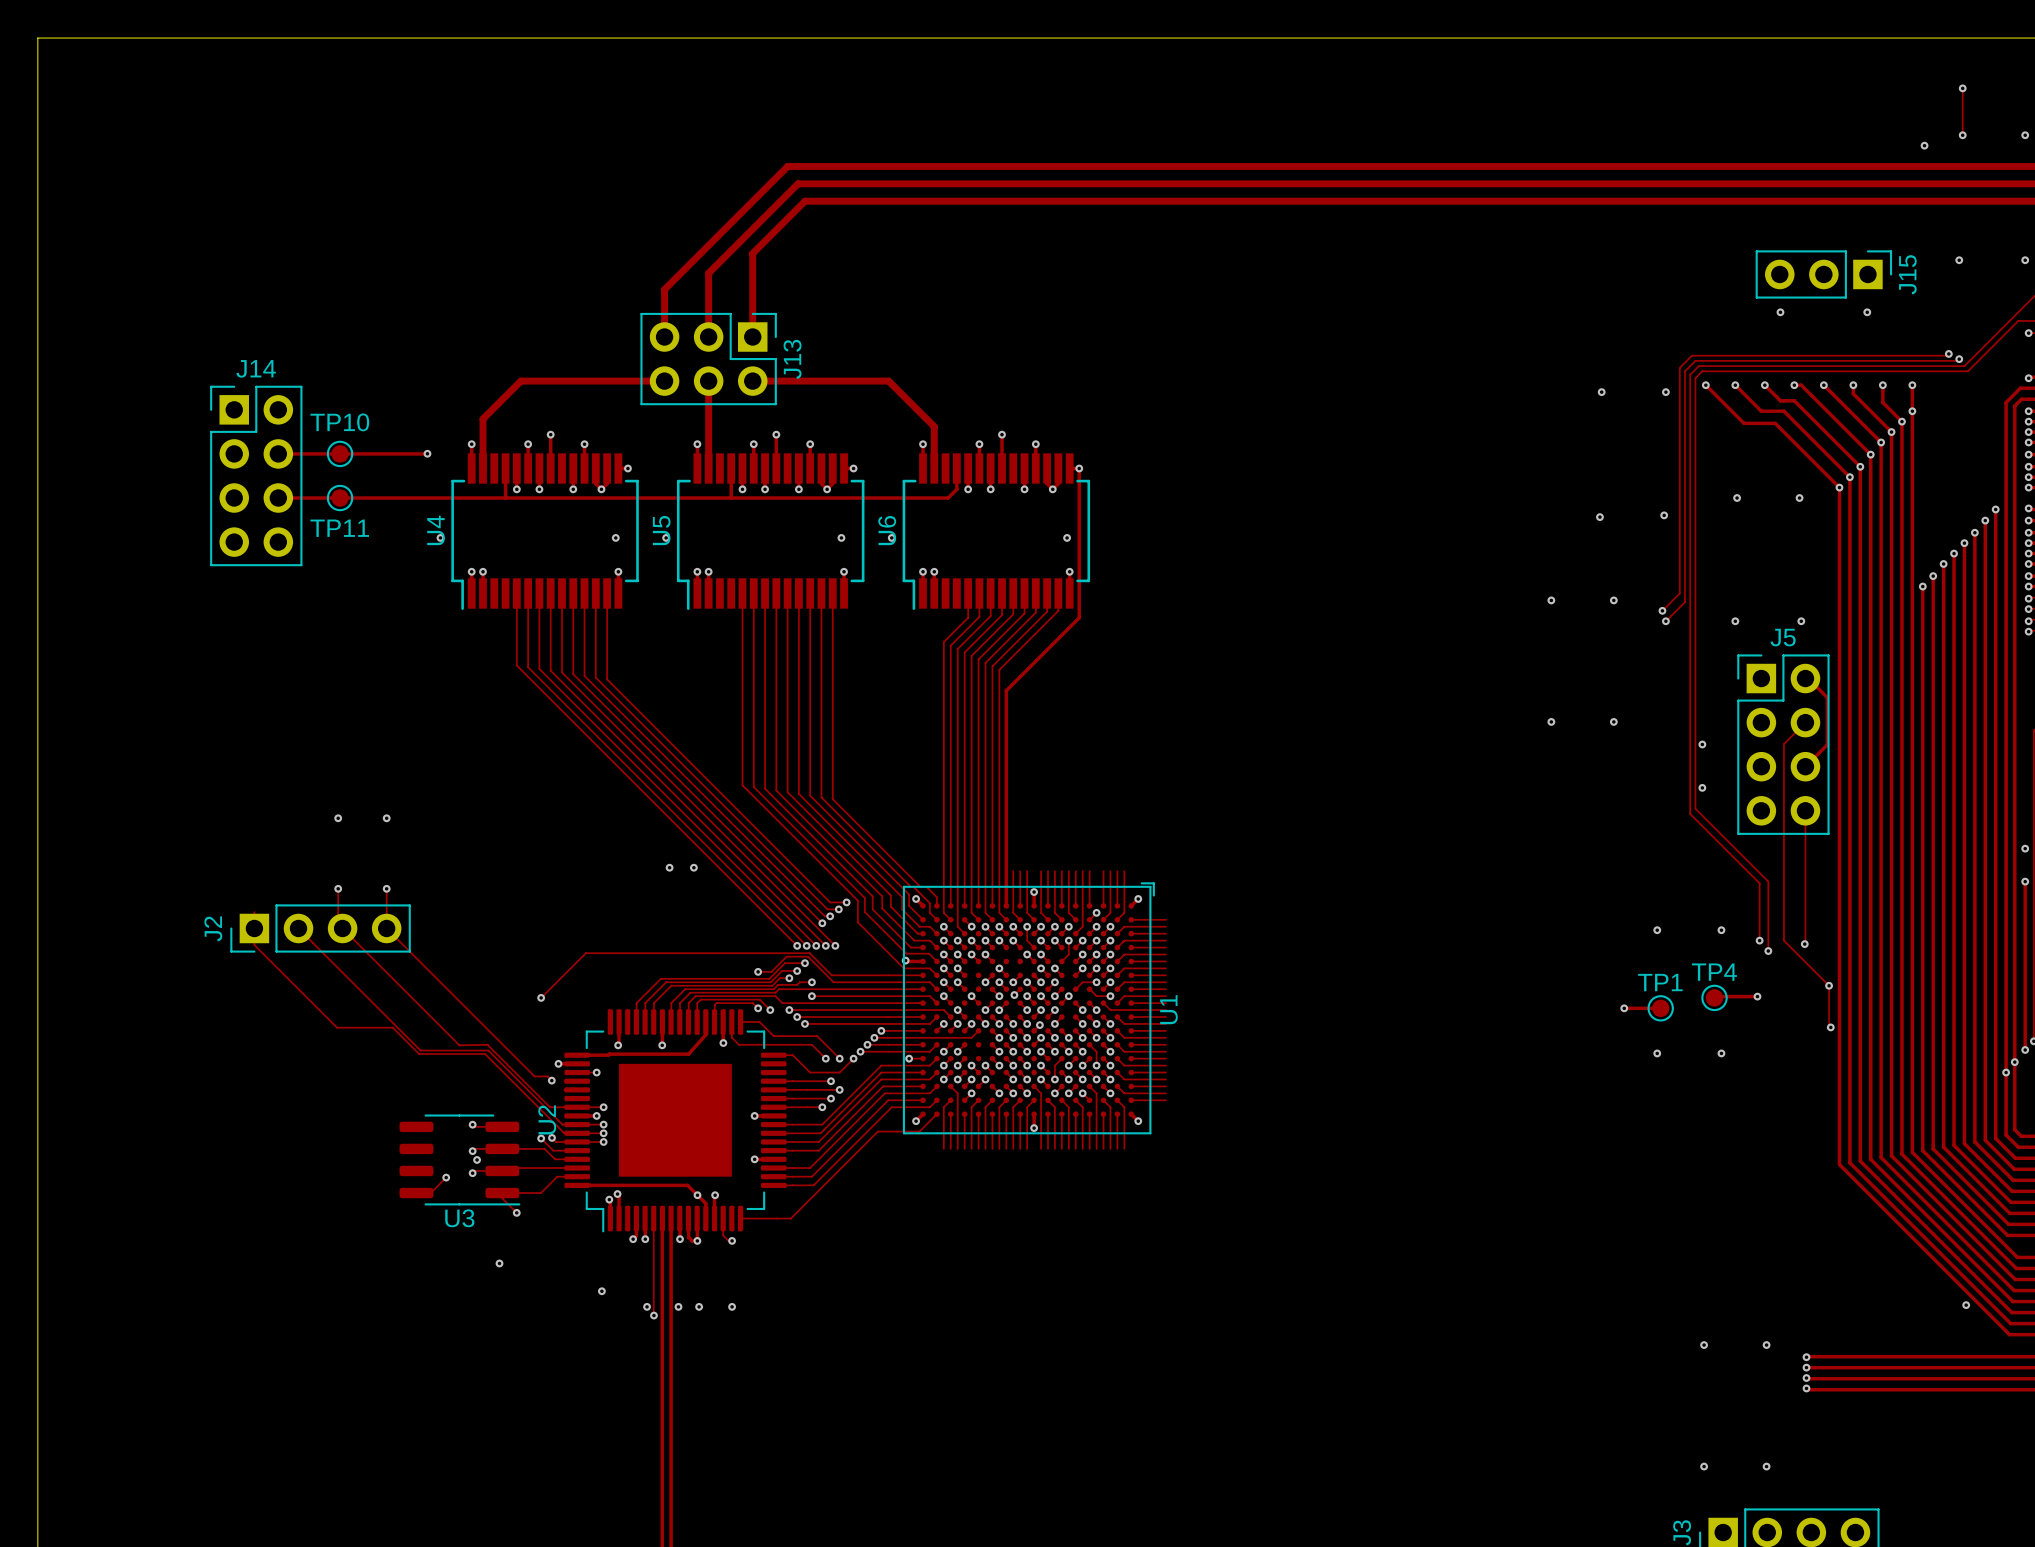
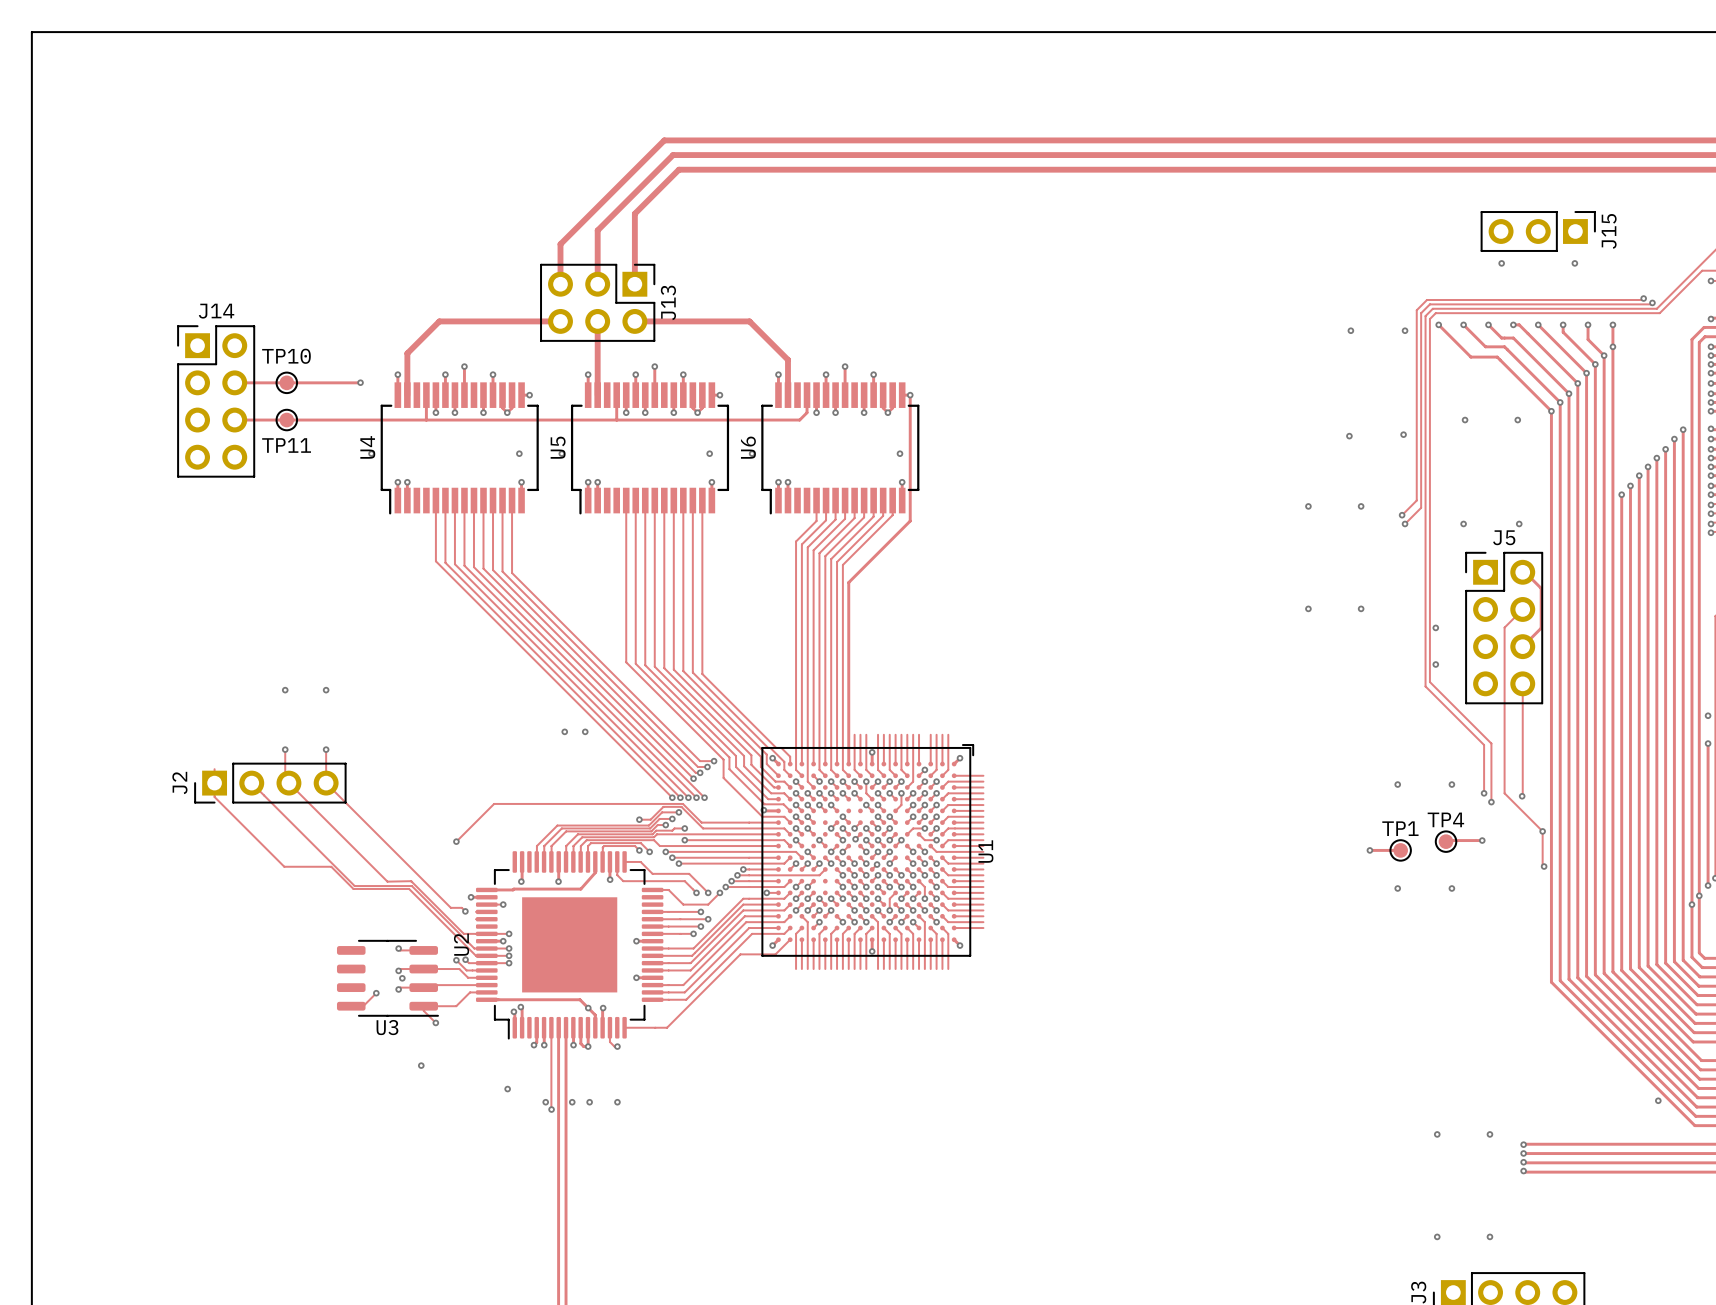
track: (1962, 88) (1962, 135) -> none
via: (1962, 88) -> none
via: (1962, 135) -> none
via: (2025, 135) -> none
via: (1924, 145) -> none
via: (1959, 260) -> none
via: (2025, 260) -> none

